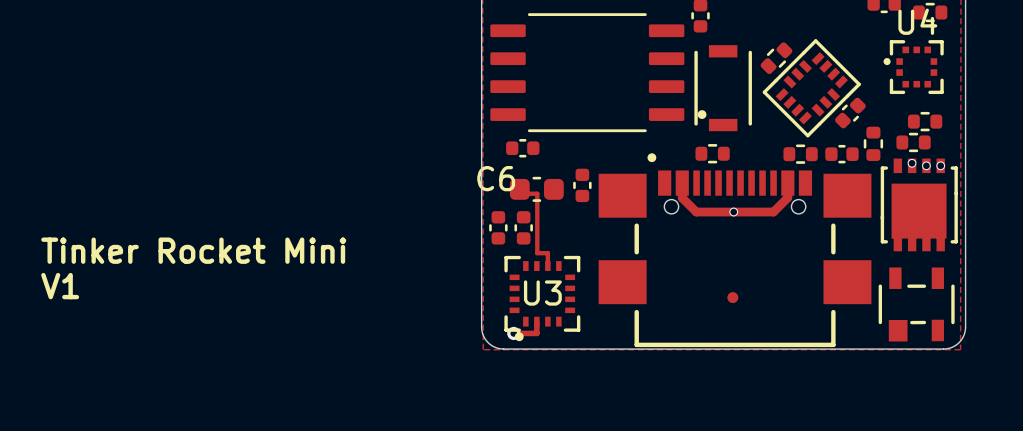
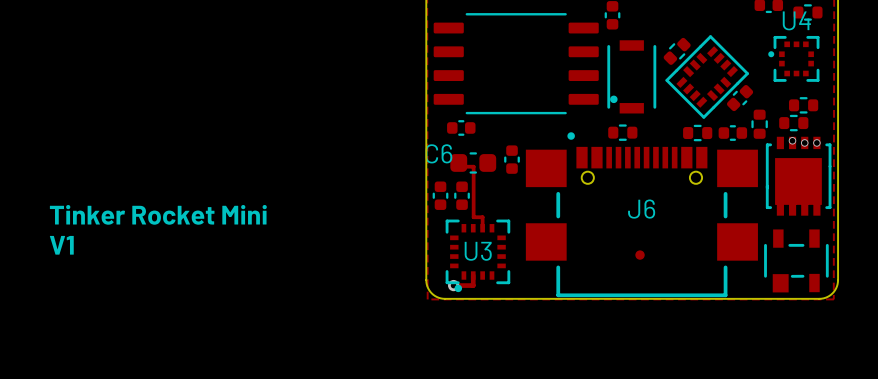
track: (682, 183) (682, 197) (696, 212) (773, 212) (787, 197) (787, 183) -> none
via: (733, 212) -> none
J6 name: none -> J6 (641, 209)

